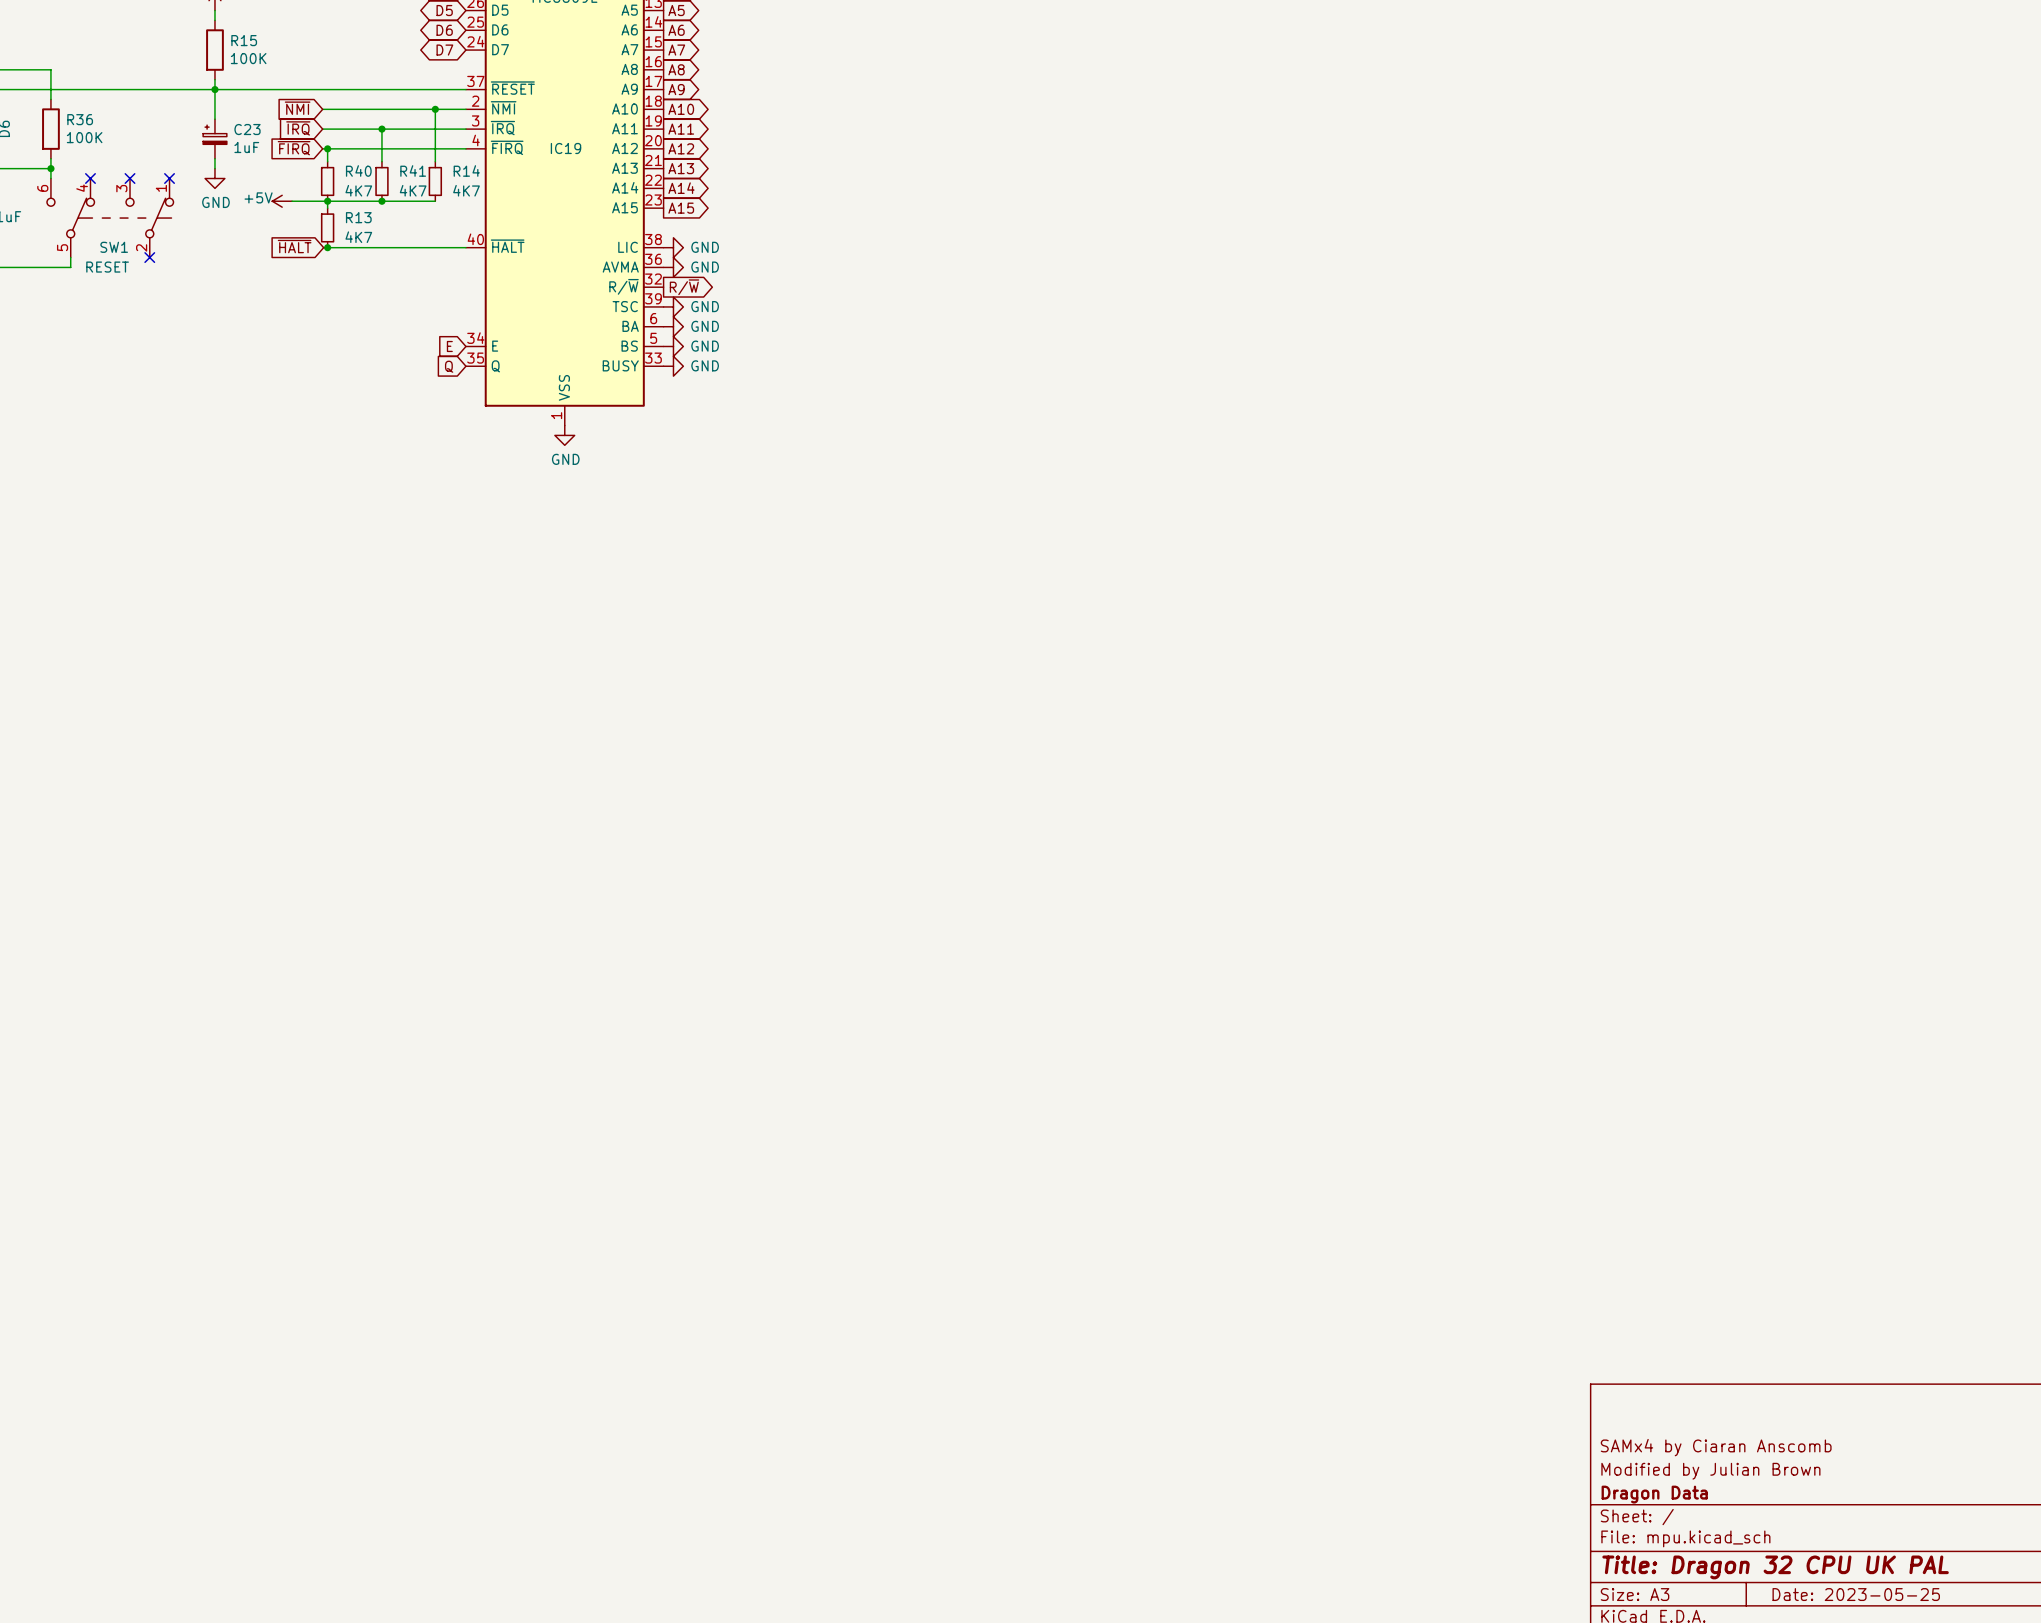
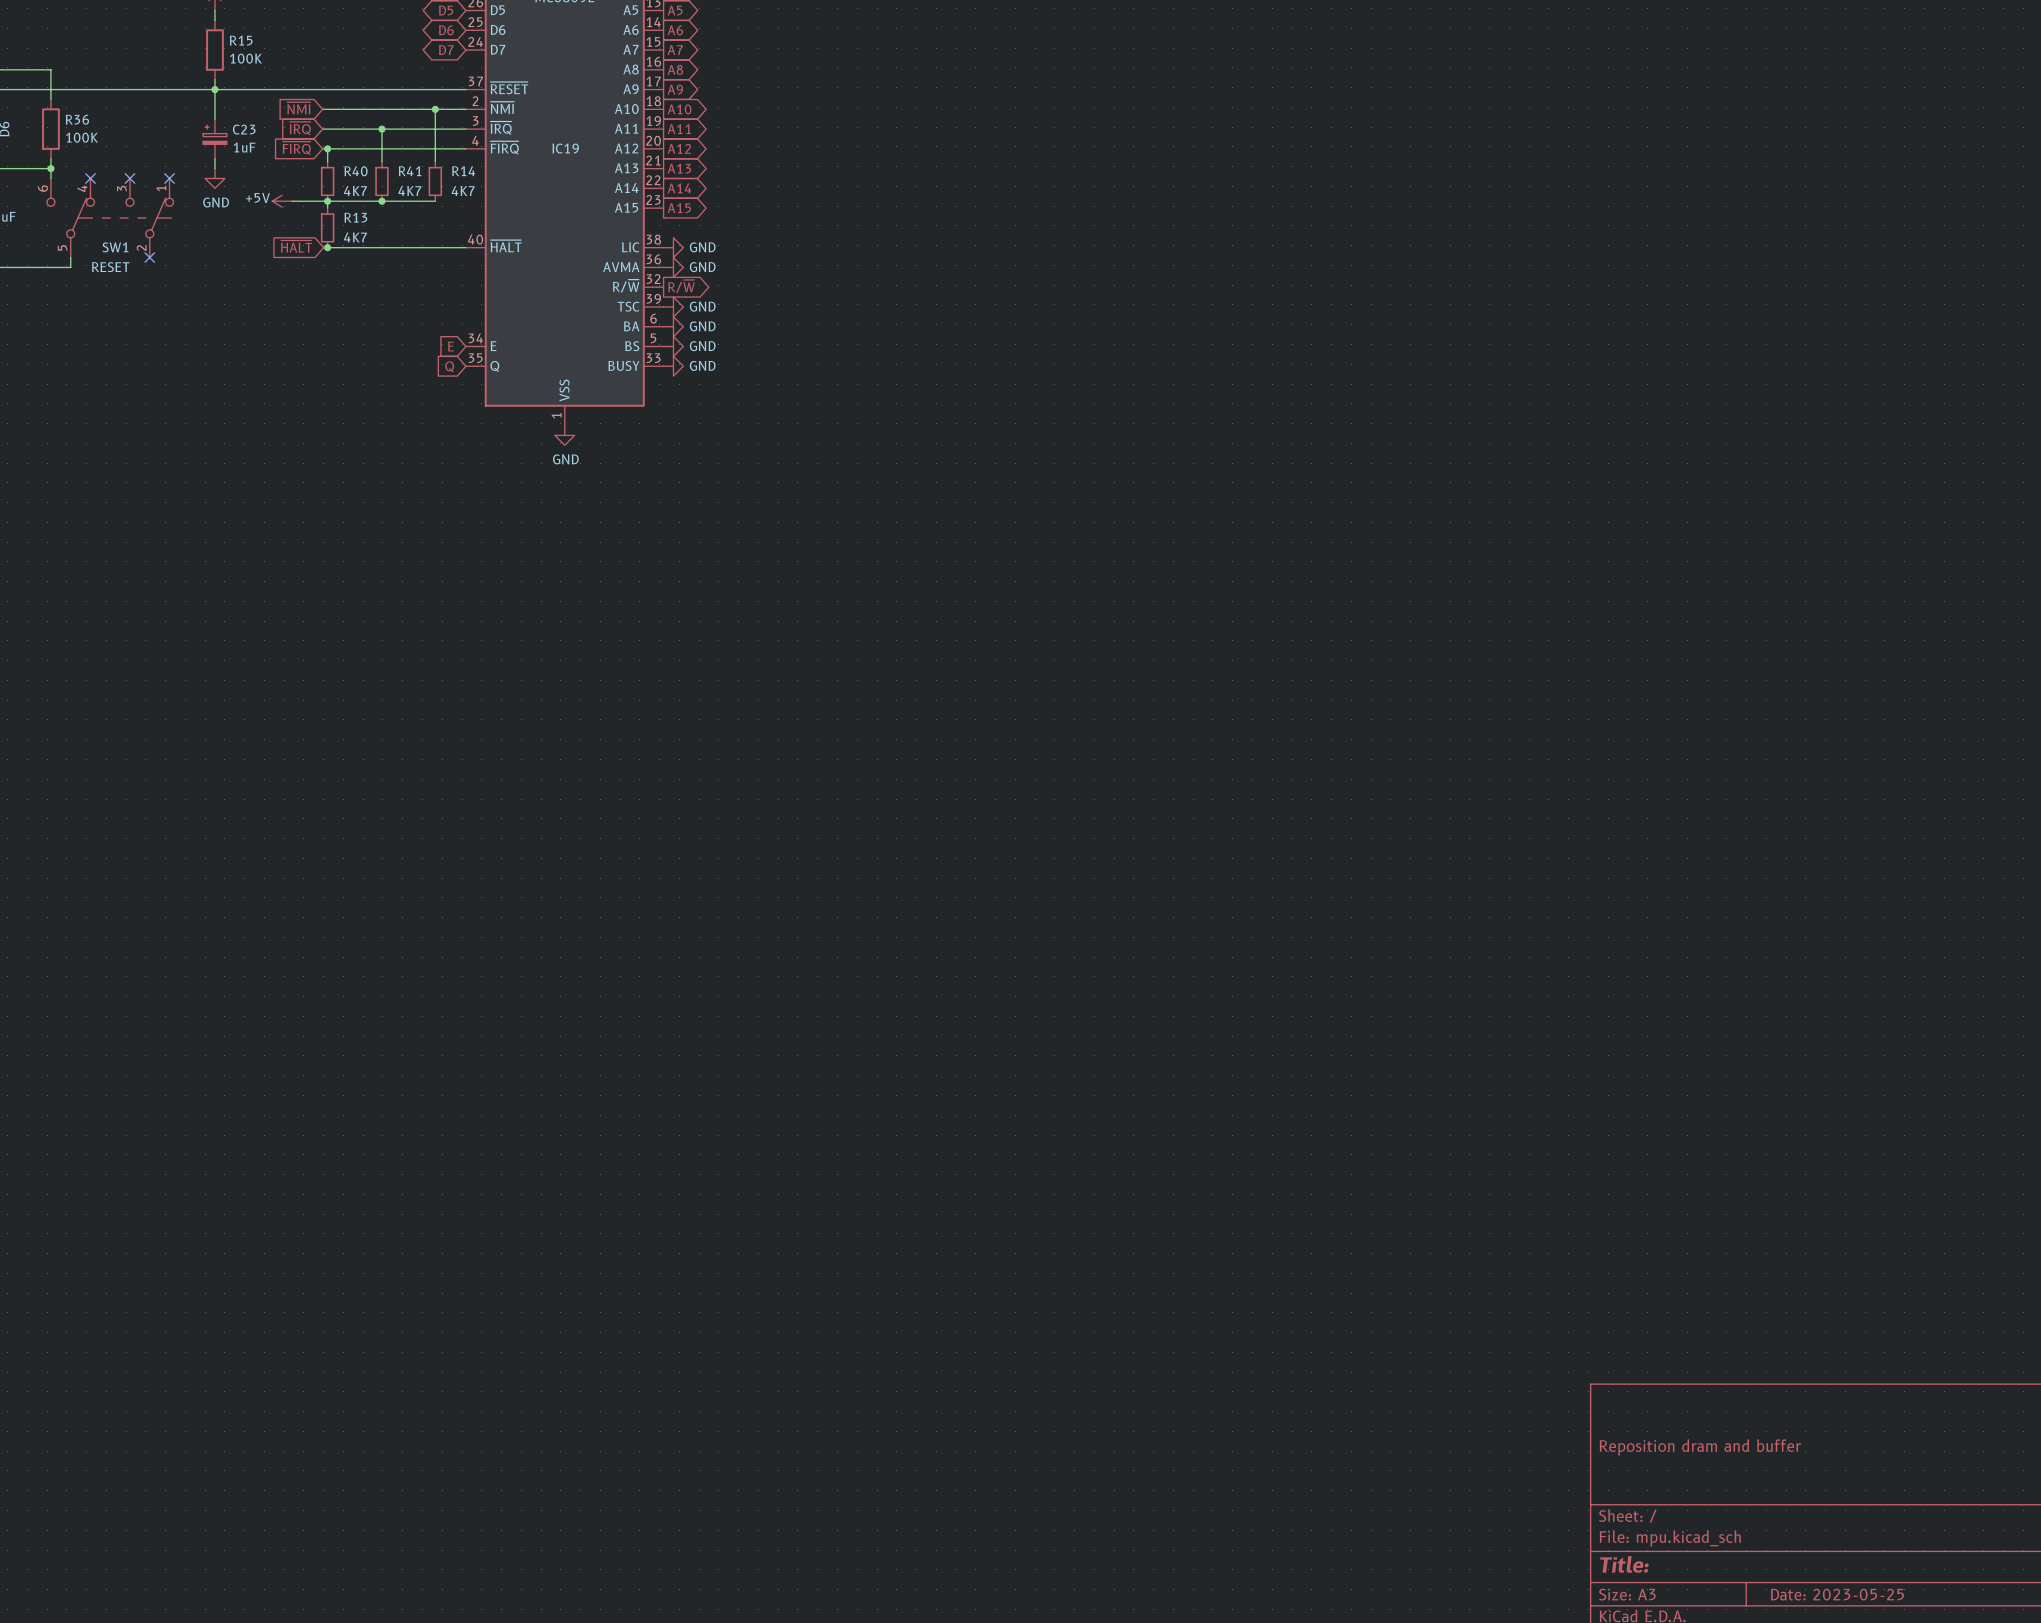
title block: SAMx4 by Ciaran Anscomb (1716, 1447) -> Reposition dram and buffer (1700, 1447)
title block: Modified by Julian Brown (1710, 1471) -> none
title block: Dragon Data (1654, 1494) -> none
title block: Title: Dragon 32 CPU UK PAL (1775, 1567) -> Title: (1624, 1564)

